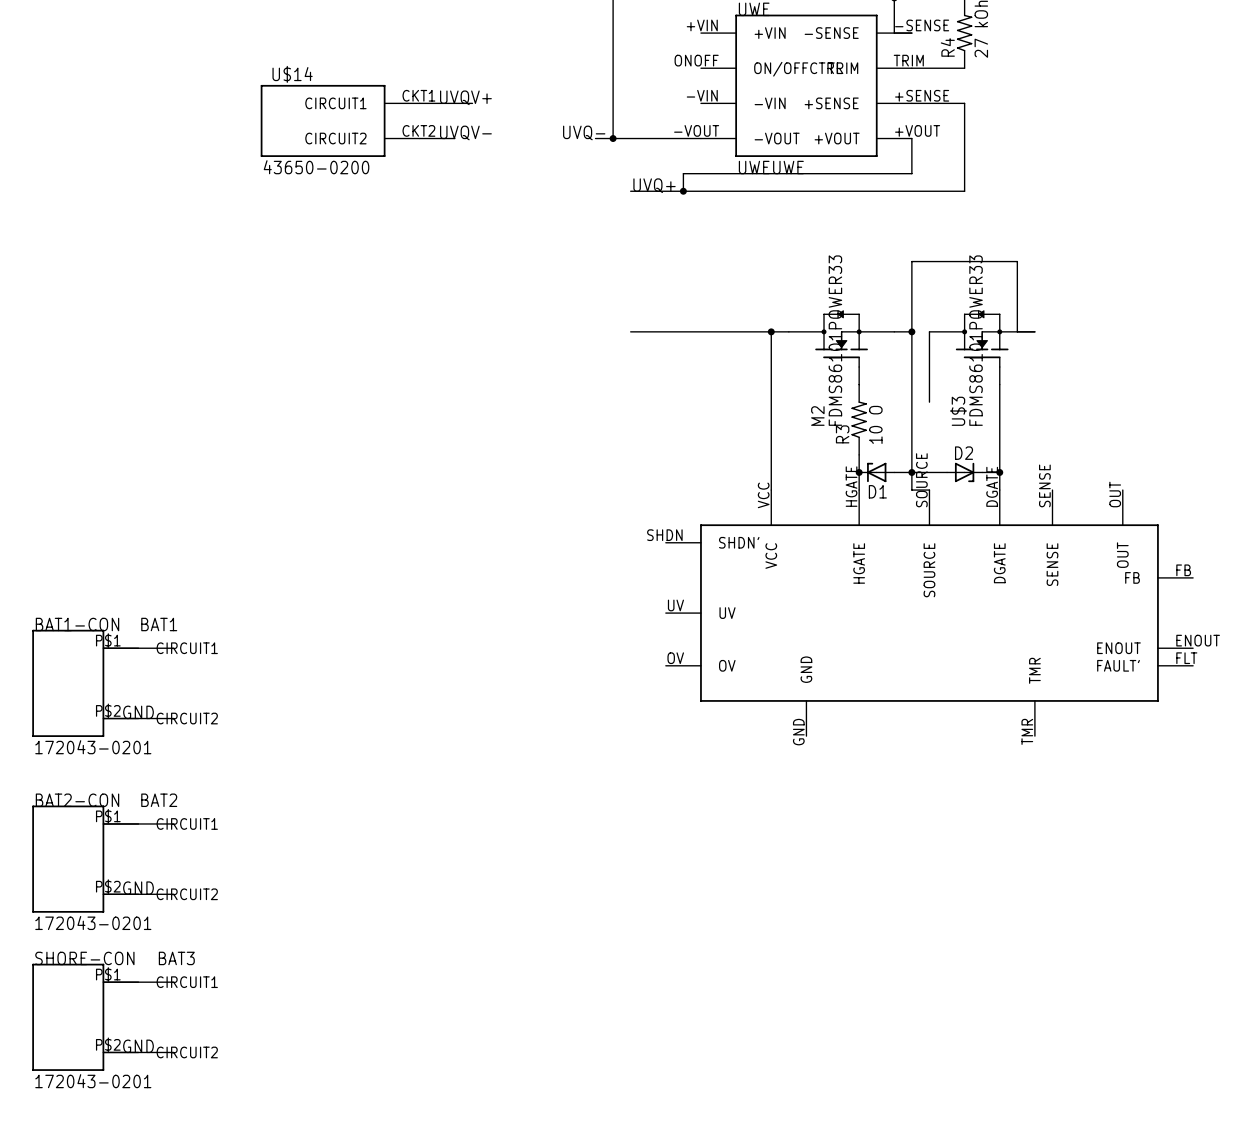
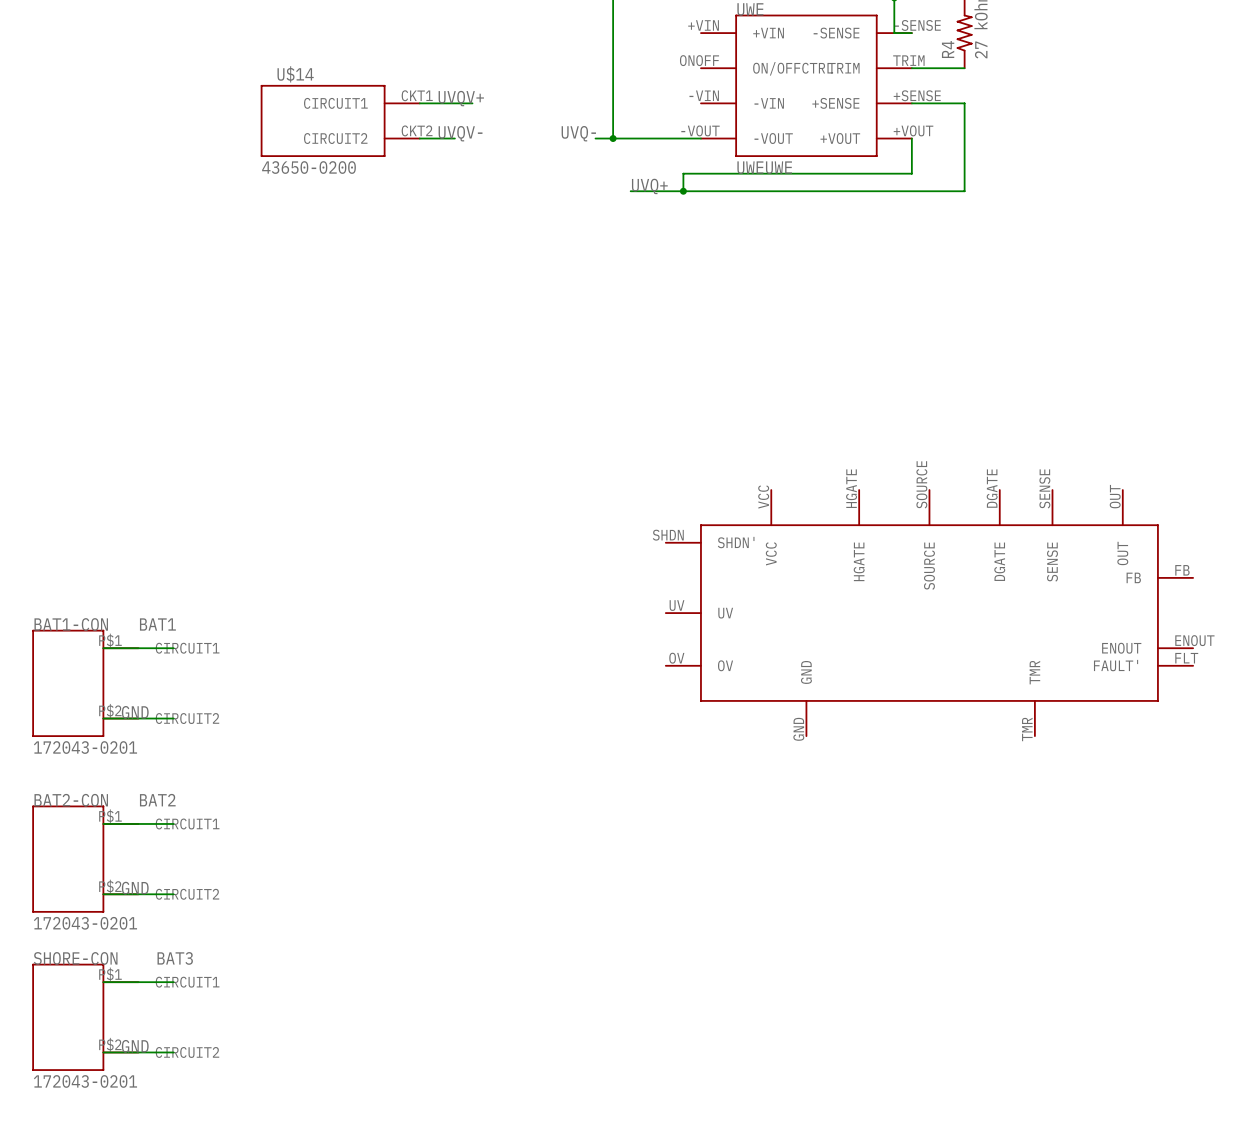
wire: (630, 331) (788, 331) -> none
wire: (771, 331) (771, 490) -> none
junction: (771, 331) -> none
wire: (894, 331) (911, 331) -> none
junction: (911, 331) -> none
wire: (929, 331) (929, 402) -> none
wire: (1034, 331) (1017, 331) (1017, 261) (911, 261) (911, 490) (929, 490) -> none
M2: FDMS86101POWER33 (841, 347) -> none
U$3: FDMS86101POWER33 (982, 347) -> none
wire: (999, 384) (999, 490) -> none
R3: 10 O (859, 419) -> none
wire: (859, 454) (859, 490) -> none
junction: (859, 472) -> none
D1: (876, 472) -> none
wire: (894, 472) (947, 472) -> none
junction: (911, 472) -> none
D2: (964, 472) -> none
wire: (982, 472) (999, 472) -> none
junction: (999, 472) -> none

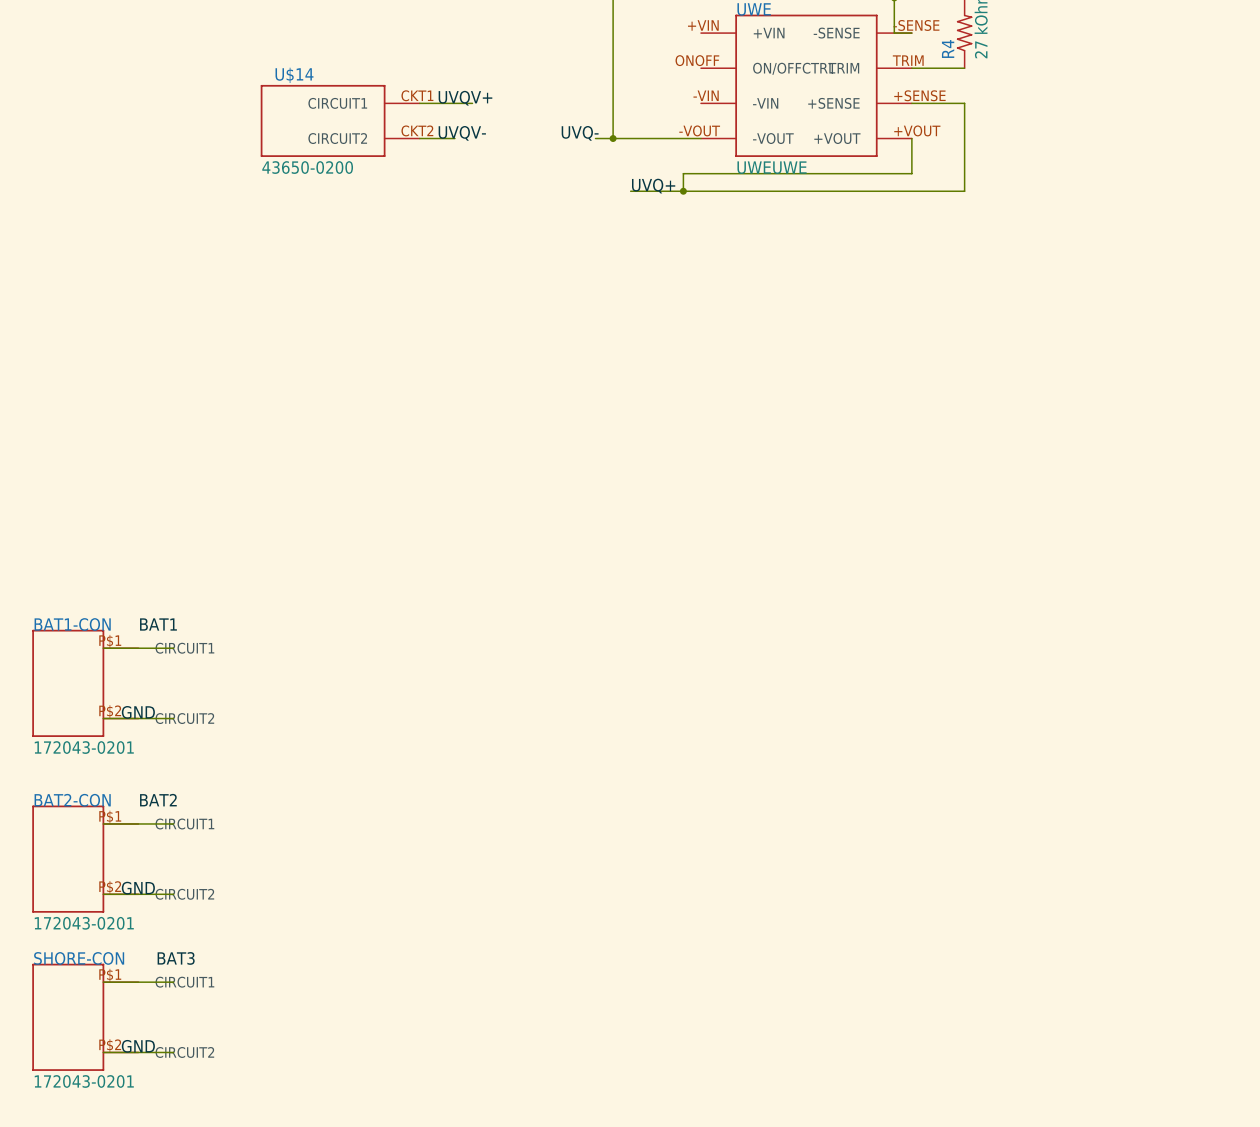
part: (929, 613) -> none

